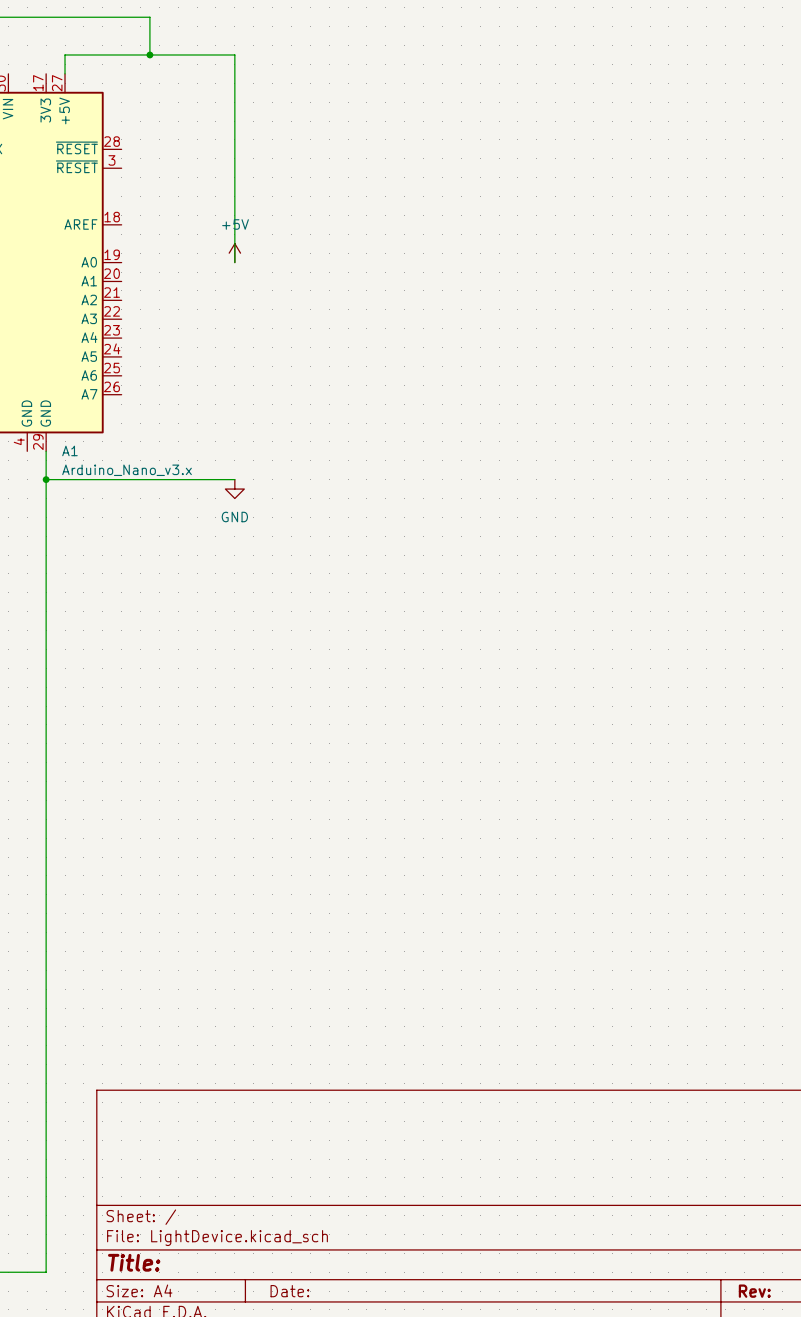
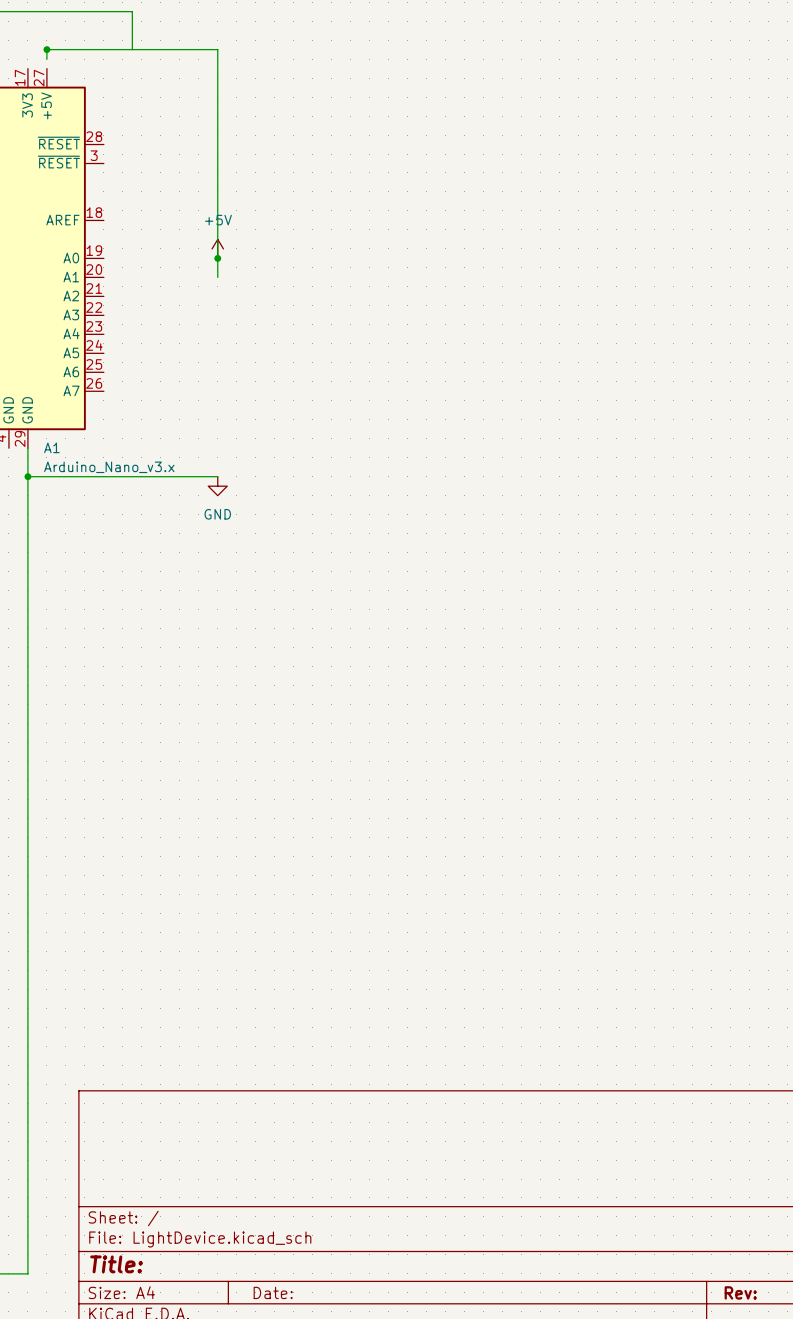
junction: none -> (46, 49)
junction: (149, 54) -> none
wire: (65, 64) (65, 73) -> none
wire: none -> (217, 258) (217, 277)
junction: none -> (217, 258)

